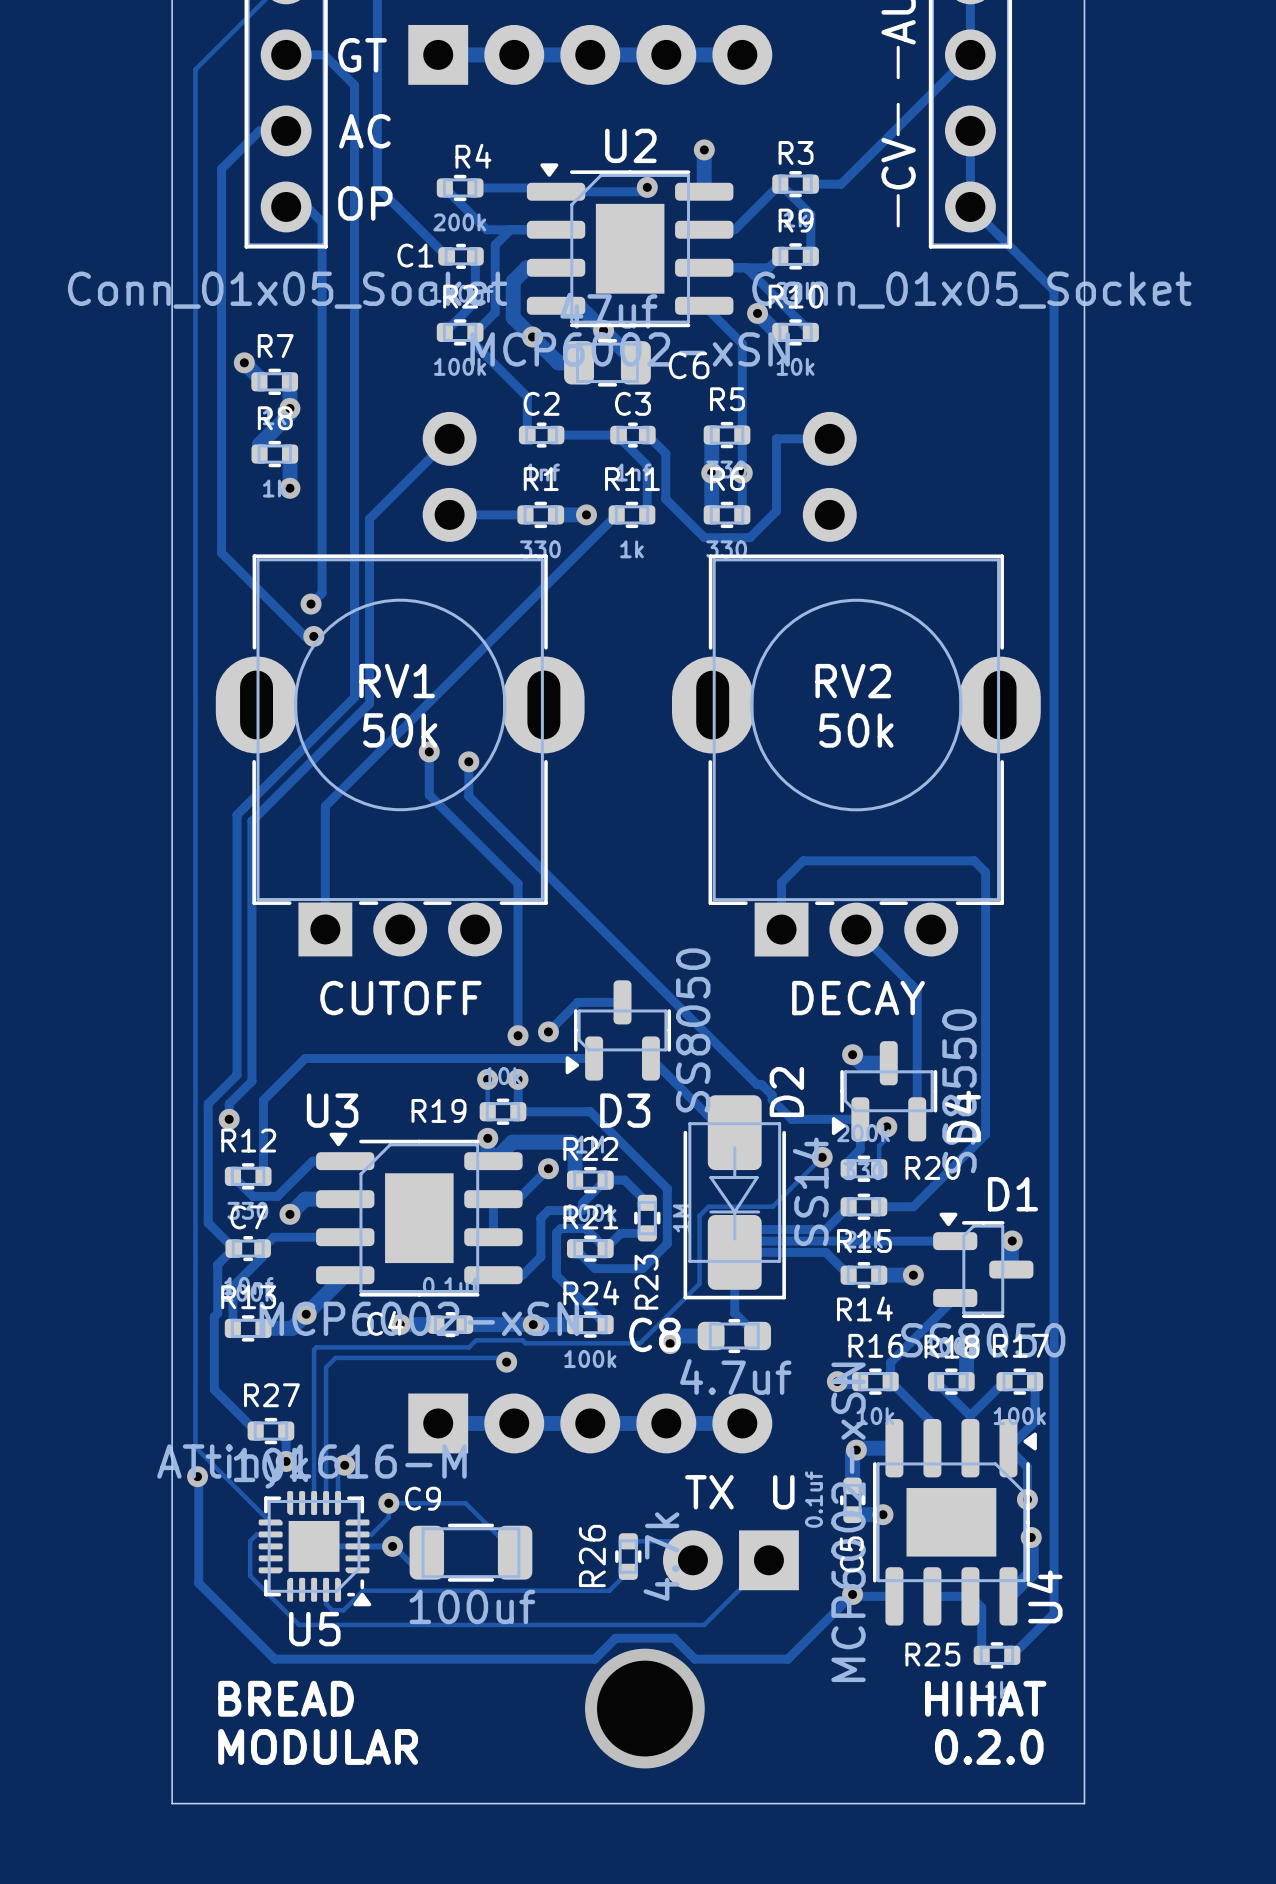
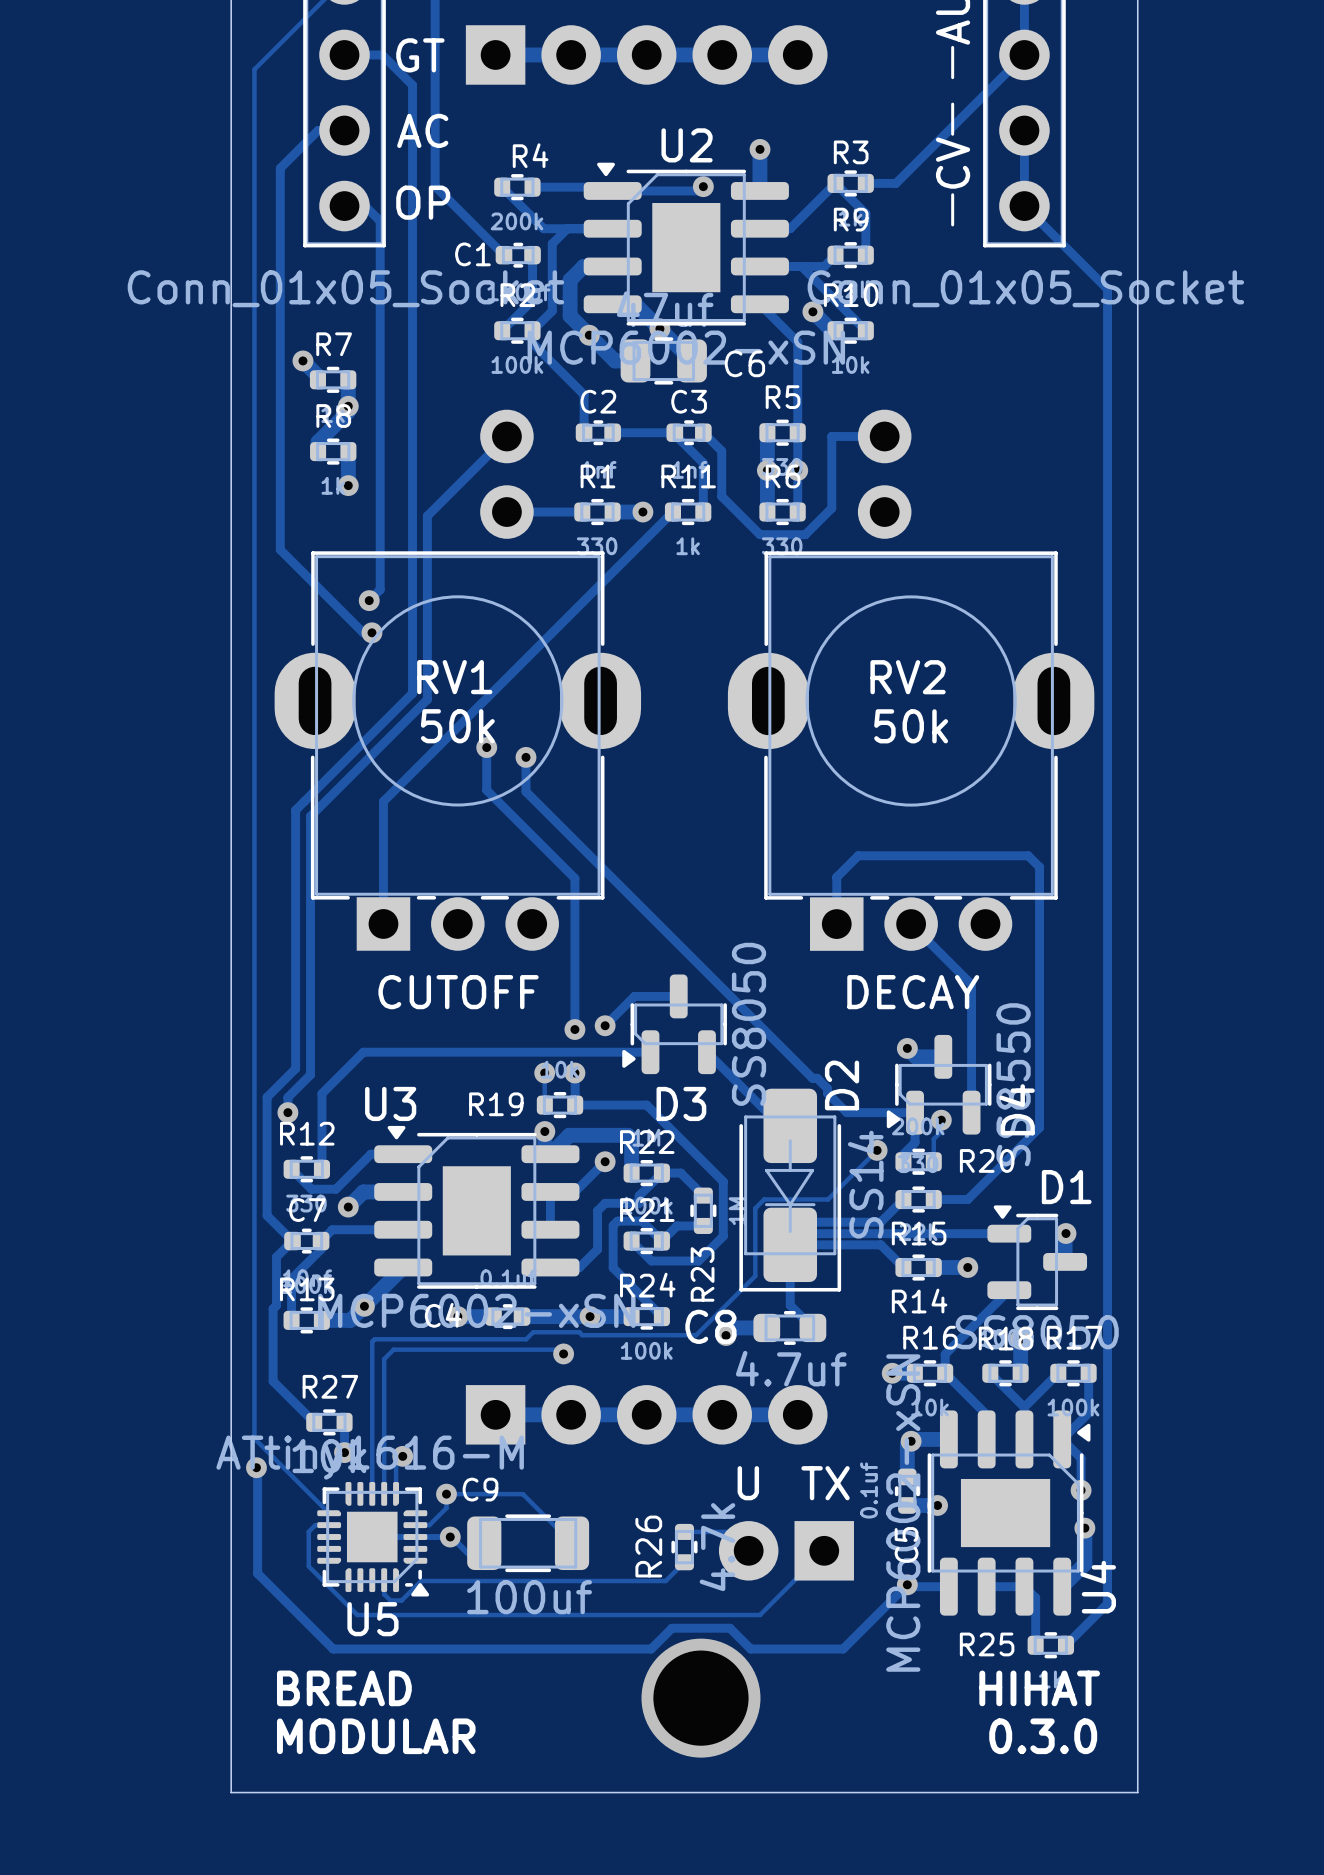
text: TX (709, 1492) -> U (748, 1483)
text: U (783, 1492) -> TX (825, 1483)
text: 0.2.0 (989, 1746) -> 0.3.0 (1043, 1736)

